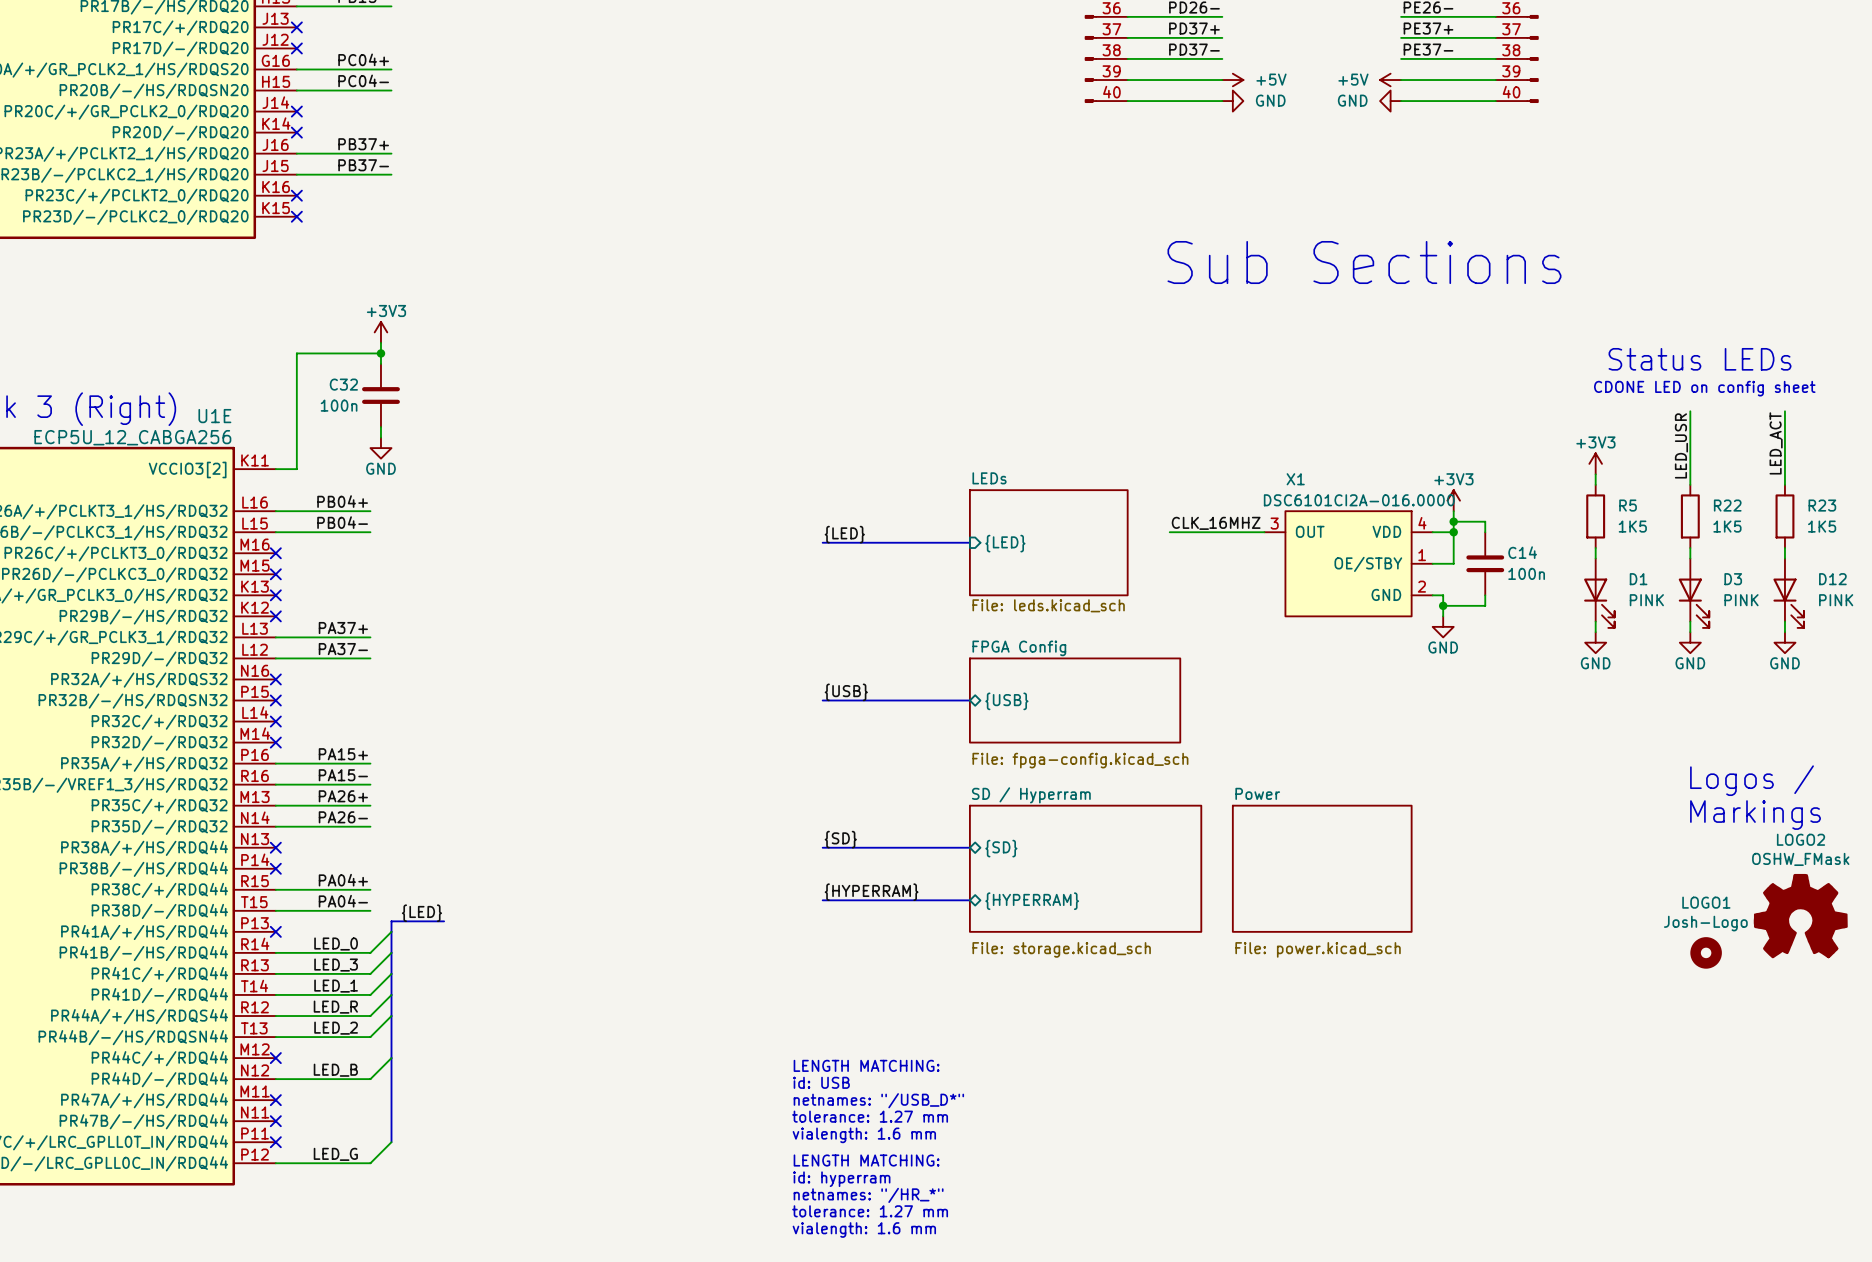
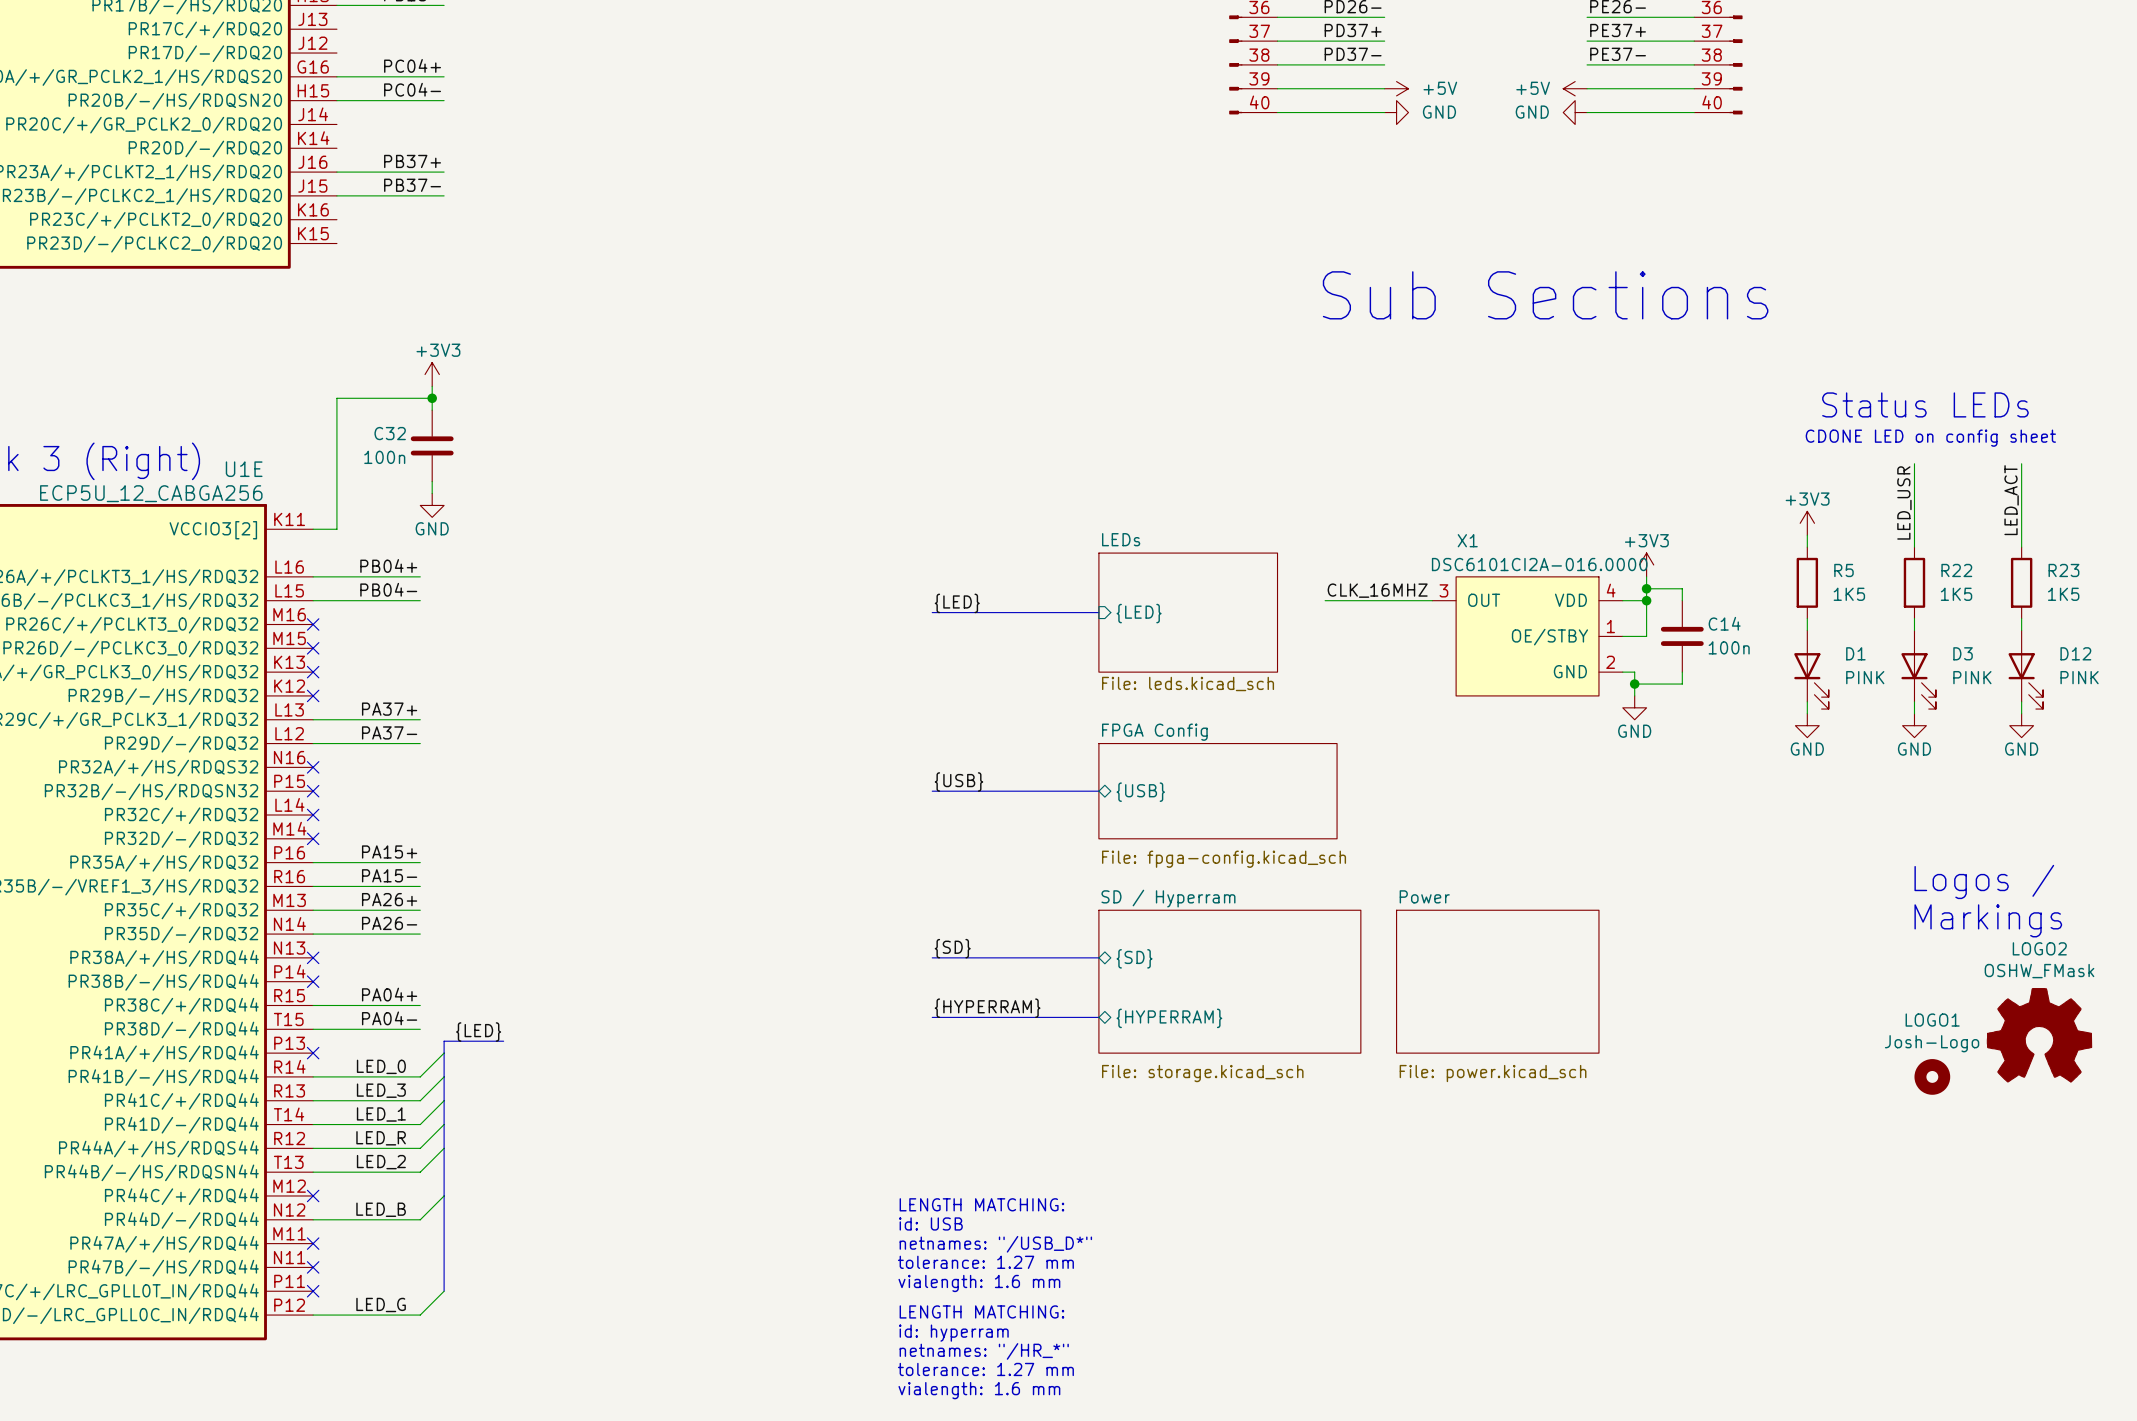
no-connect mark: (296, 27) -> none
no-connect mark: (296, 48) -> none
no-connect mark: (296, 111) -> none
no-connect mark: (296, 132) -> none
no-connect mark: (296, 195) -> none
no-connect mark: (296, 216) -> none

